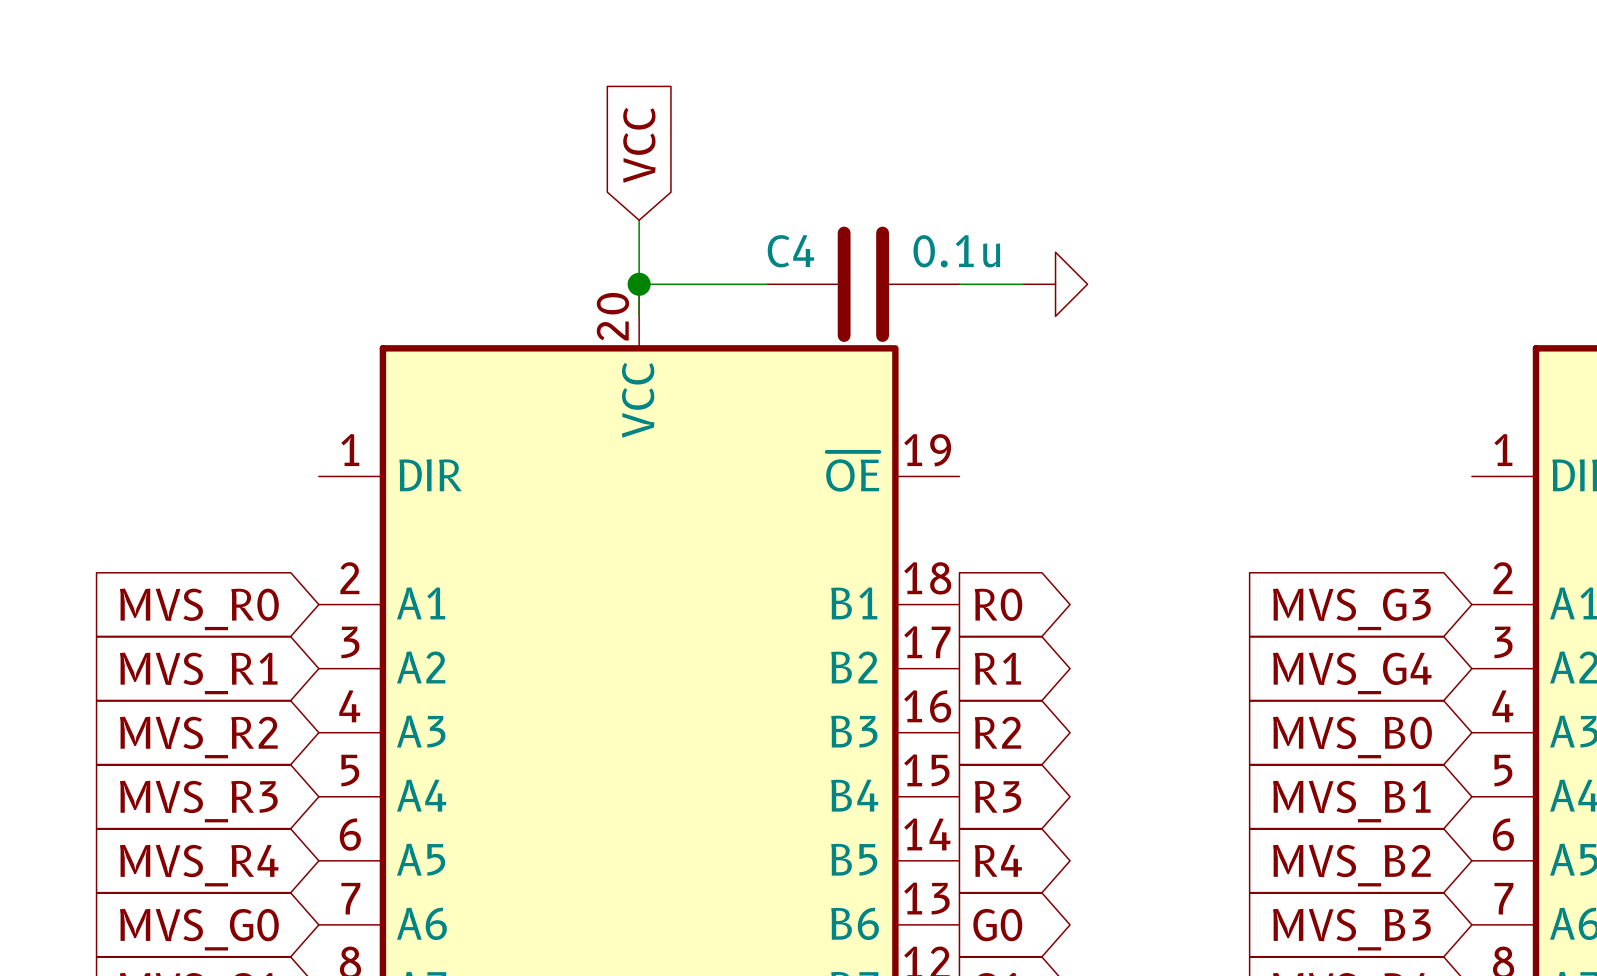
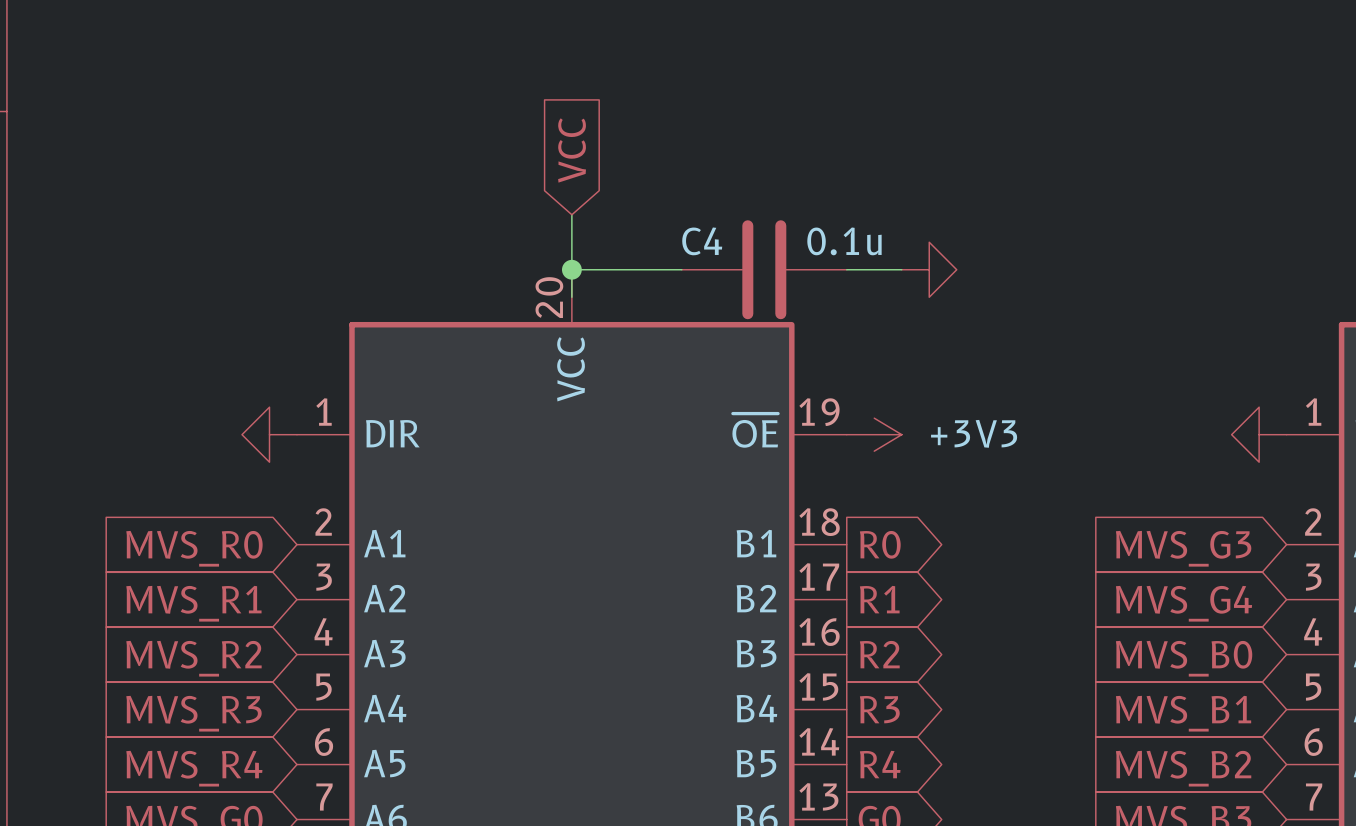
power symbol: none -> (269, 434)
power symbol: none -> +3V3 (874, 434)
power symbol: none -> (1259, 434)

